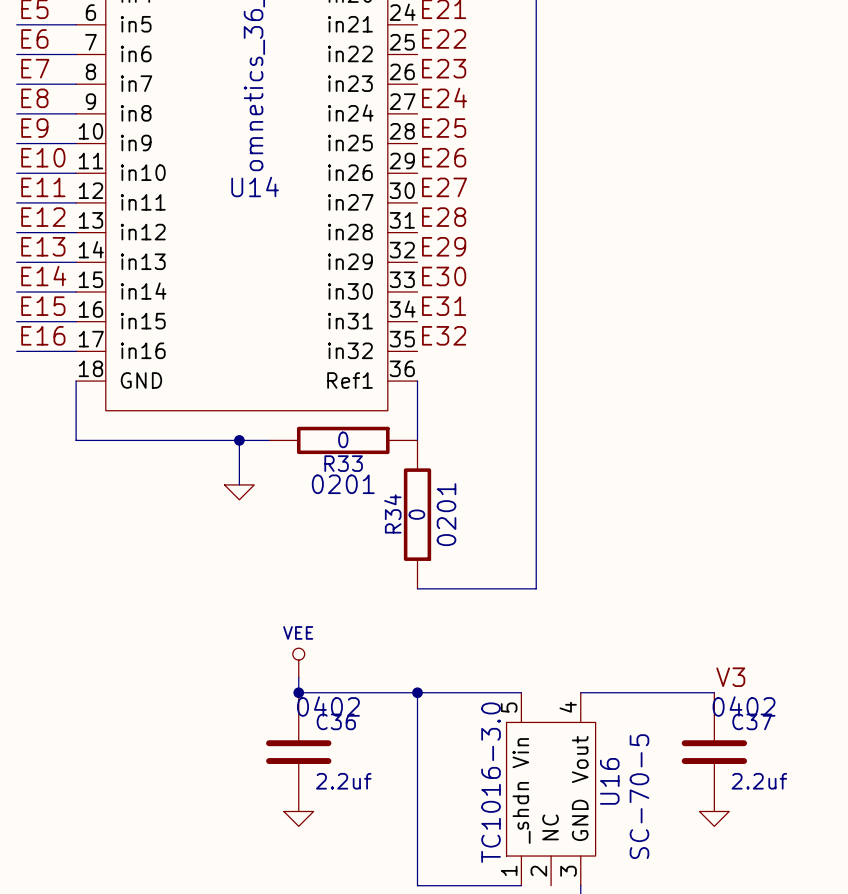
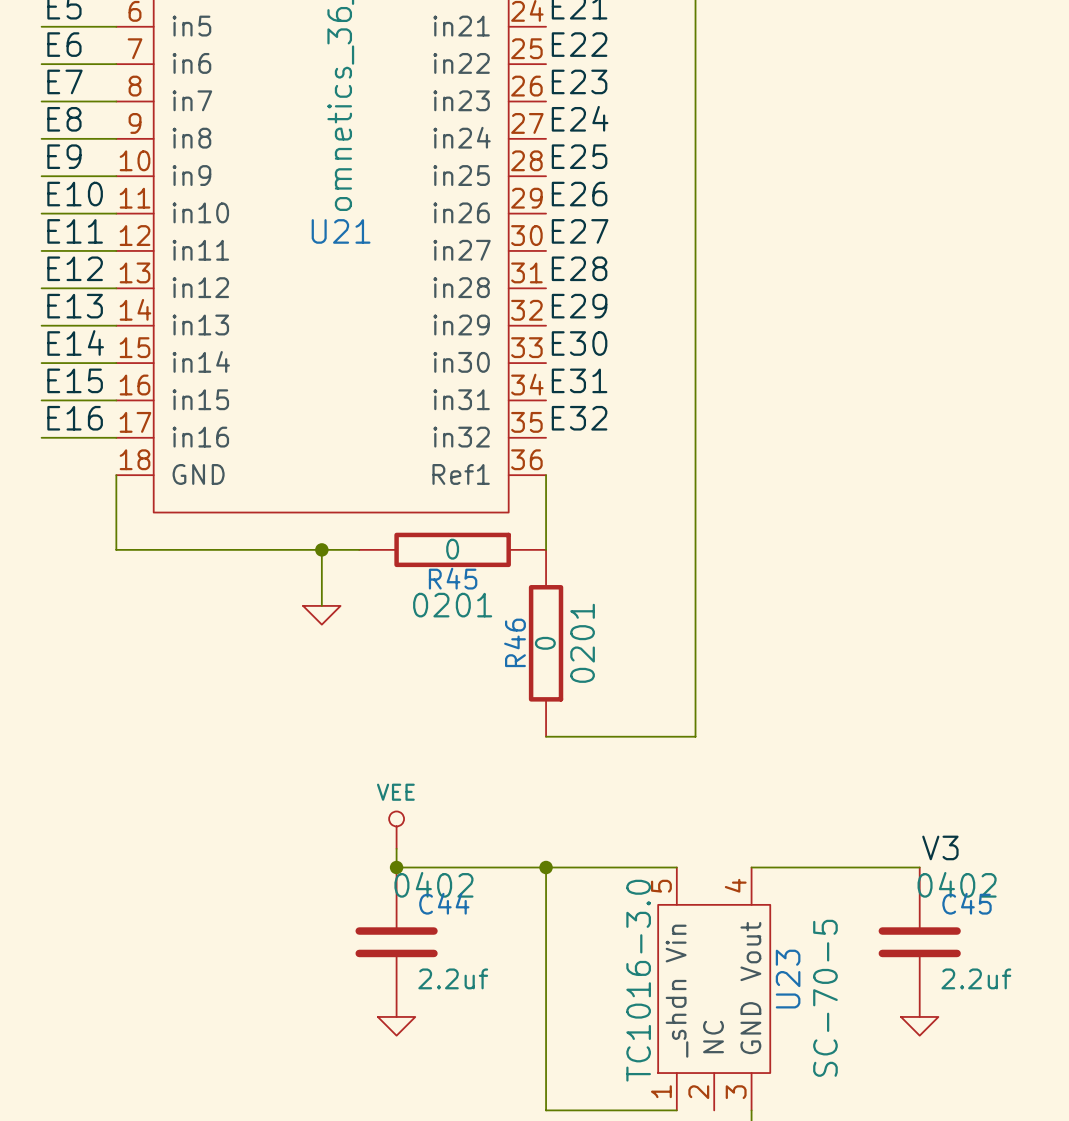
U14 name: U14 (255, 187) -> U21 (341, 231)
R33 name: R33 (343, 463) -> R45 (453, 578)
R34 name: R34 (392, 513) -> R46 (515, 642)
C36 name: C36 (336, 721) -> C44 (444, 903)
C37 name: C37 (752, 721) -> C45 (967, 903)
U16 name: U16 (609, 781) -> U23 (788, 979)

